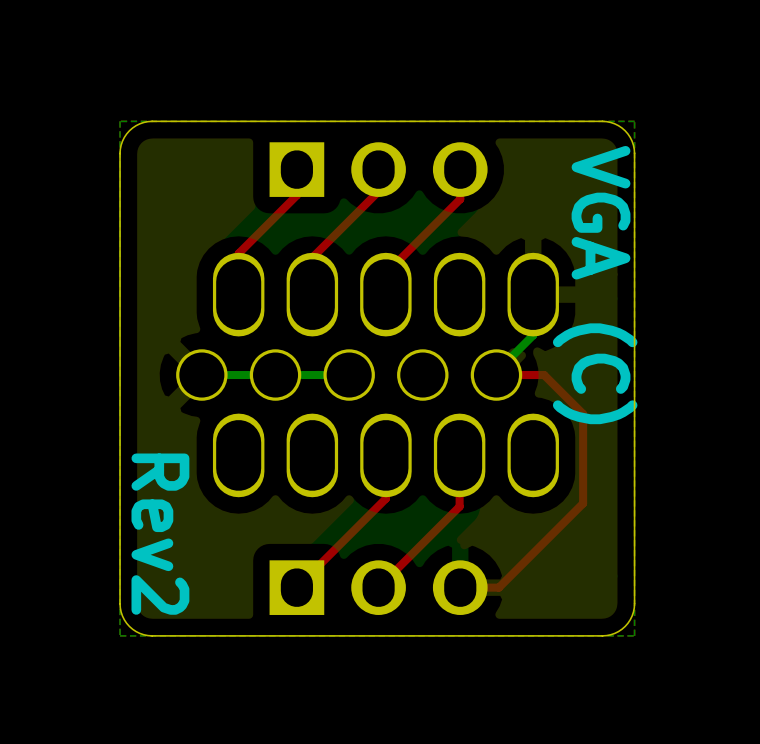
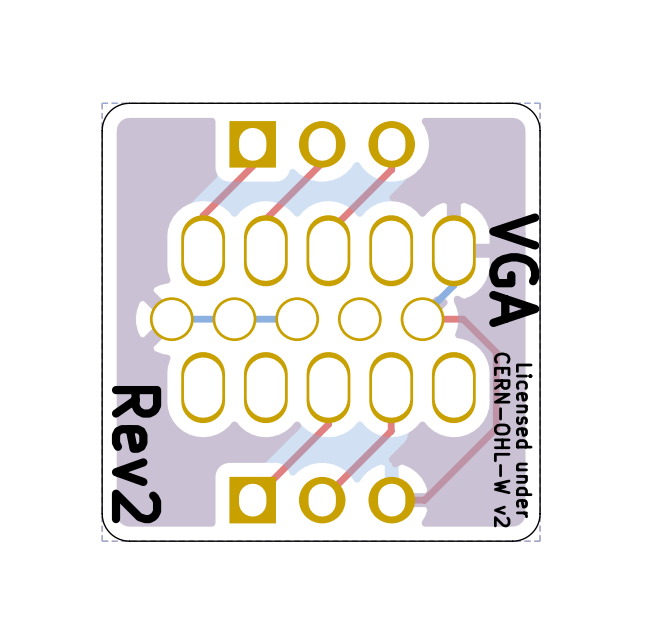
part value: VGA (C) (595, 285) -> VGA (514, 270)
text: none -> CERN-OHL-W v2 (502, 439)
text: none -> Licensed under (524, 440)

